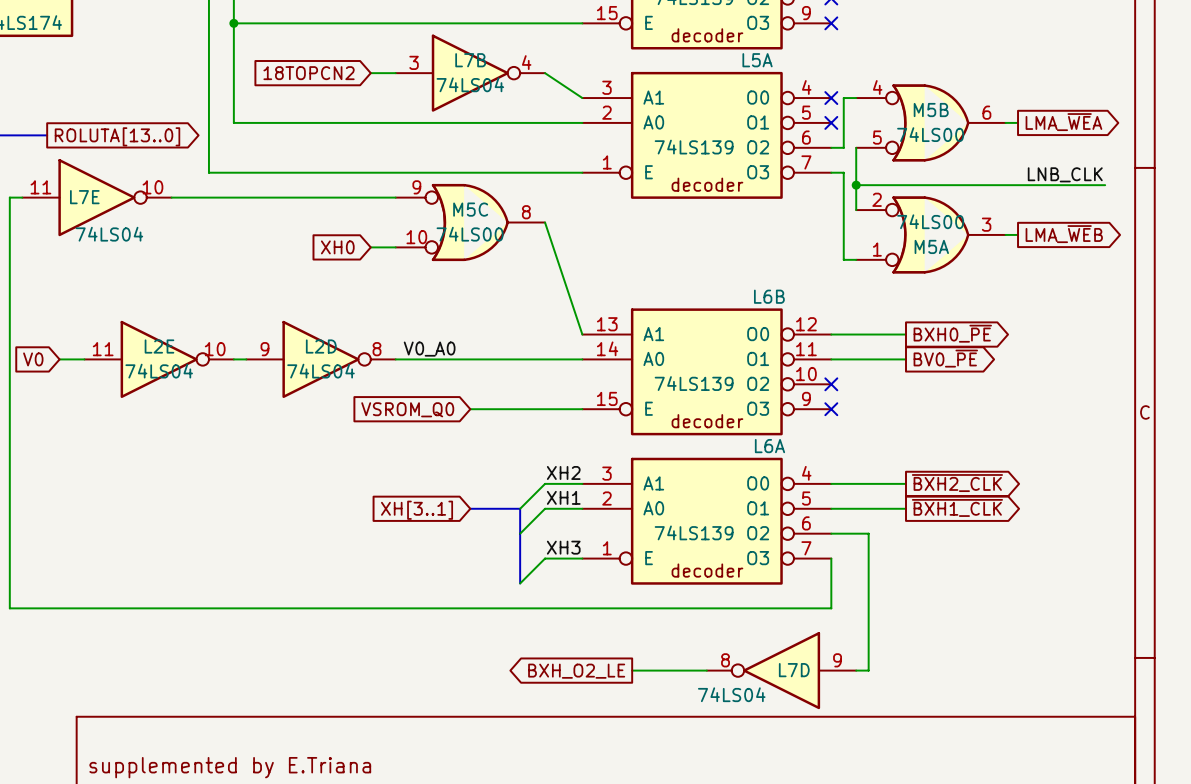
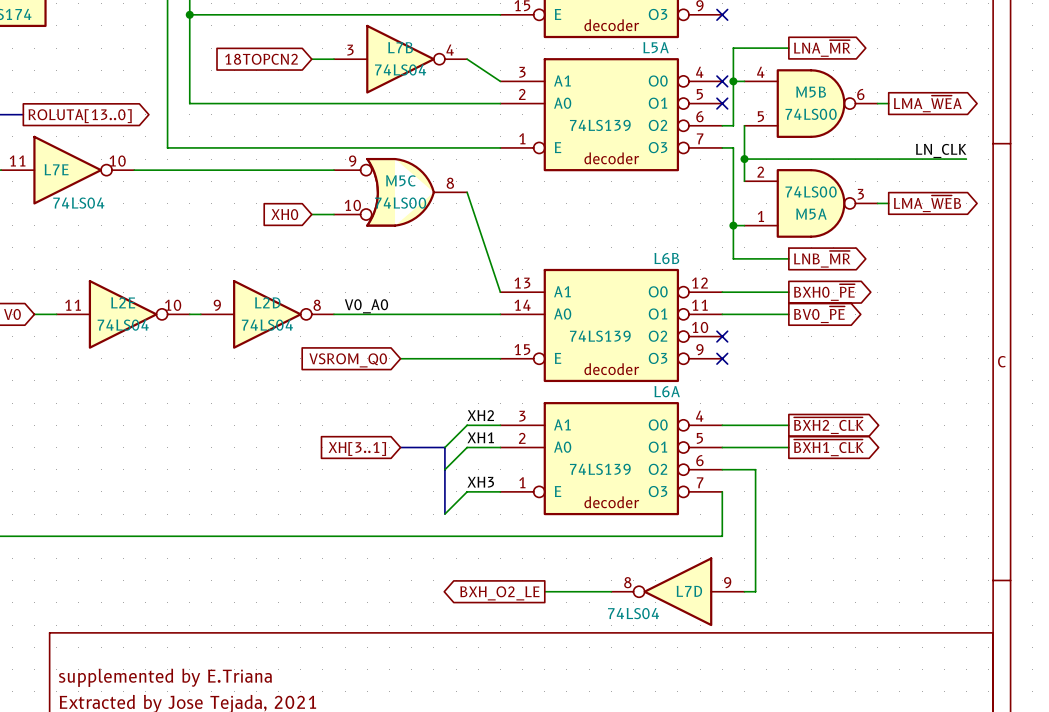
global label: none -> LNA_~{MR} (822, 48)
wire: none -> (788, 48) (733, 48) (733, 81)
M5B symbol: [856, 84, 1006, 162] -> [744, 69, 878, 138]
junction: none -> (733, 81)
label: LNB_CLK (1065, 174) -> LN_CLK (941, 150)
M5A symbol: [856, 196, 1006, 274] -> [744, 169, 878, 238]
wire: none -> (733, 225) (733, 258) (788, 258)
junction: none -> (733, 225)
global label: none -> LNB_~{MR} (822, 259)

